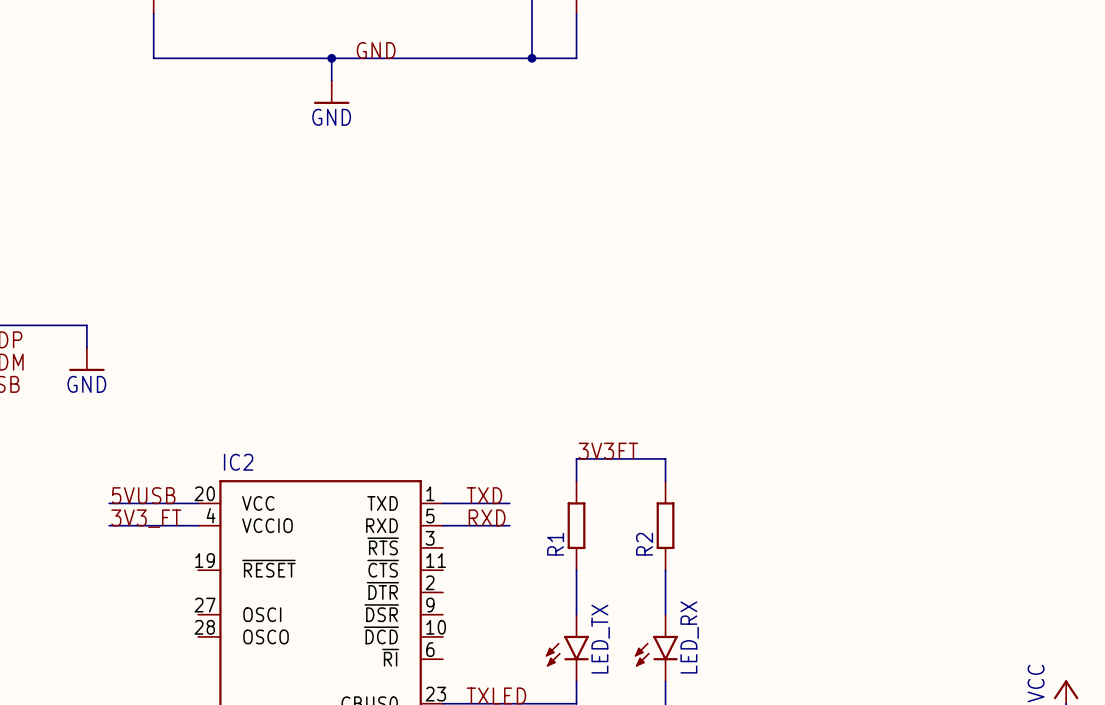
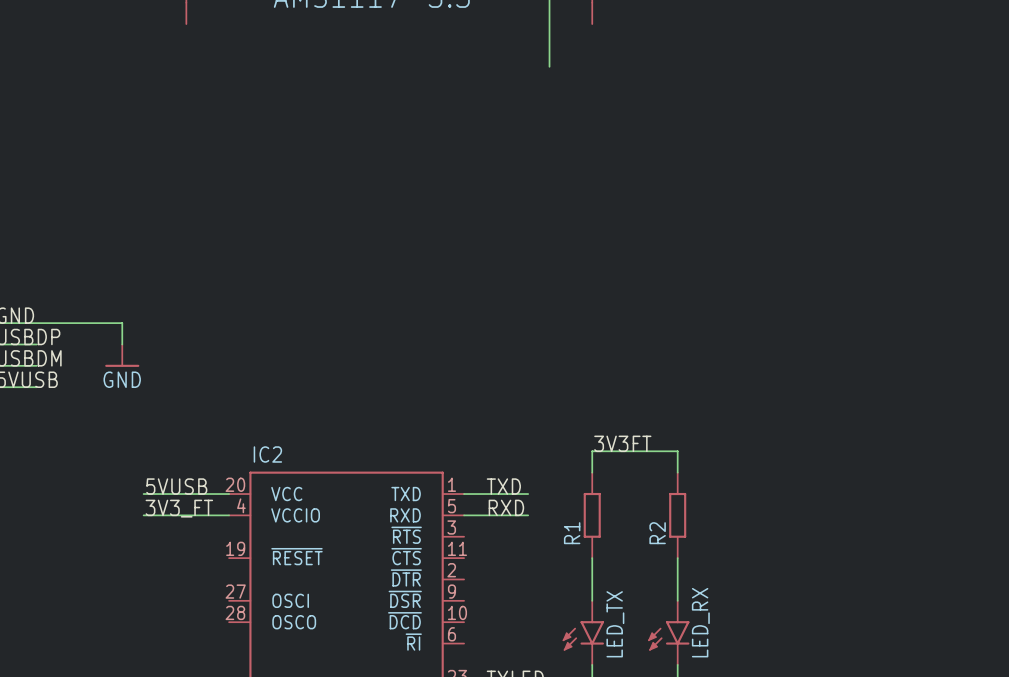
wire: (153, 13) (153, 58) (576, 58) (576, 13) -> none
label: GND (376, 50) -> none
wire: (331, 58) (331, 80) -> none
junction: (331, 58) -> none
junction: (532, 58) -> none
power symbol: GND (331, 92) -> none

